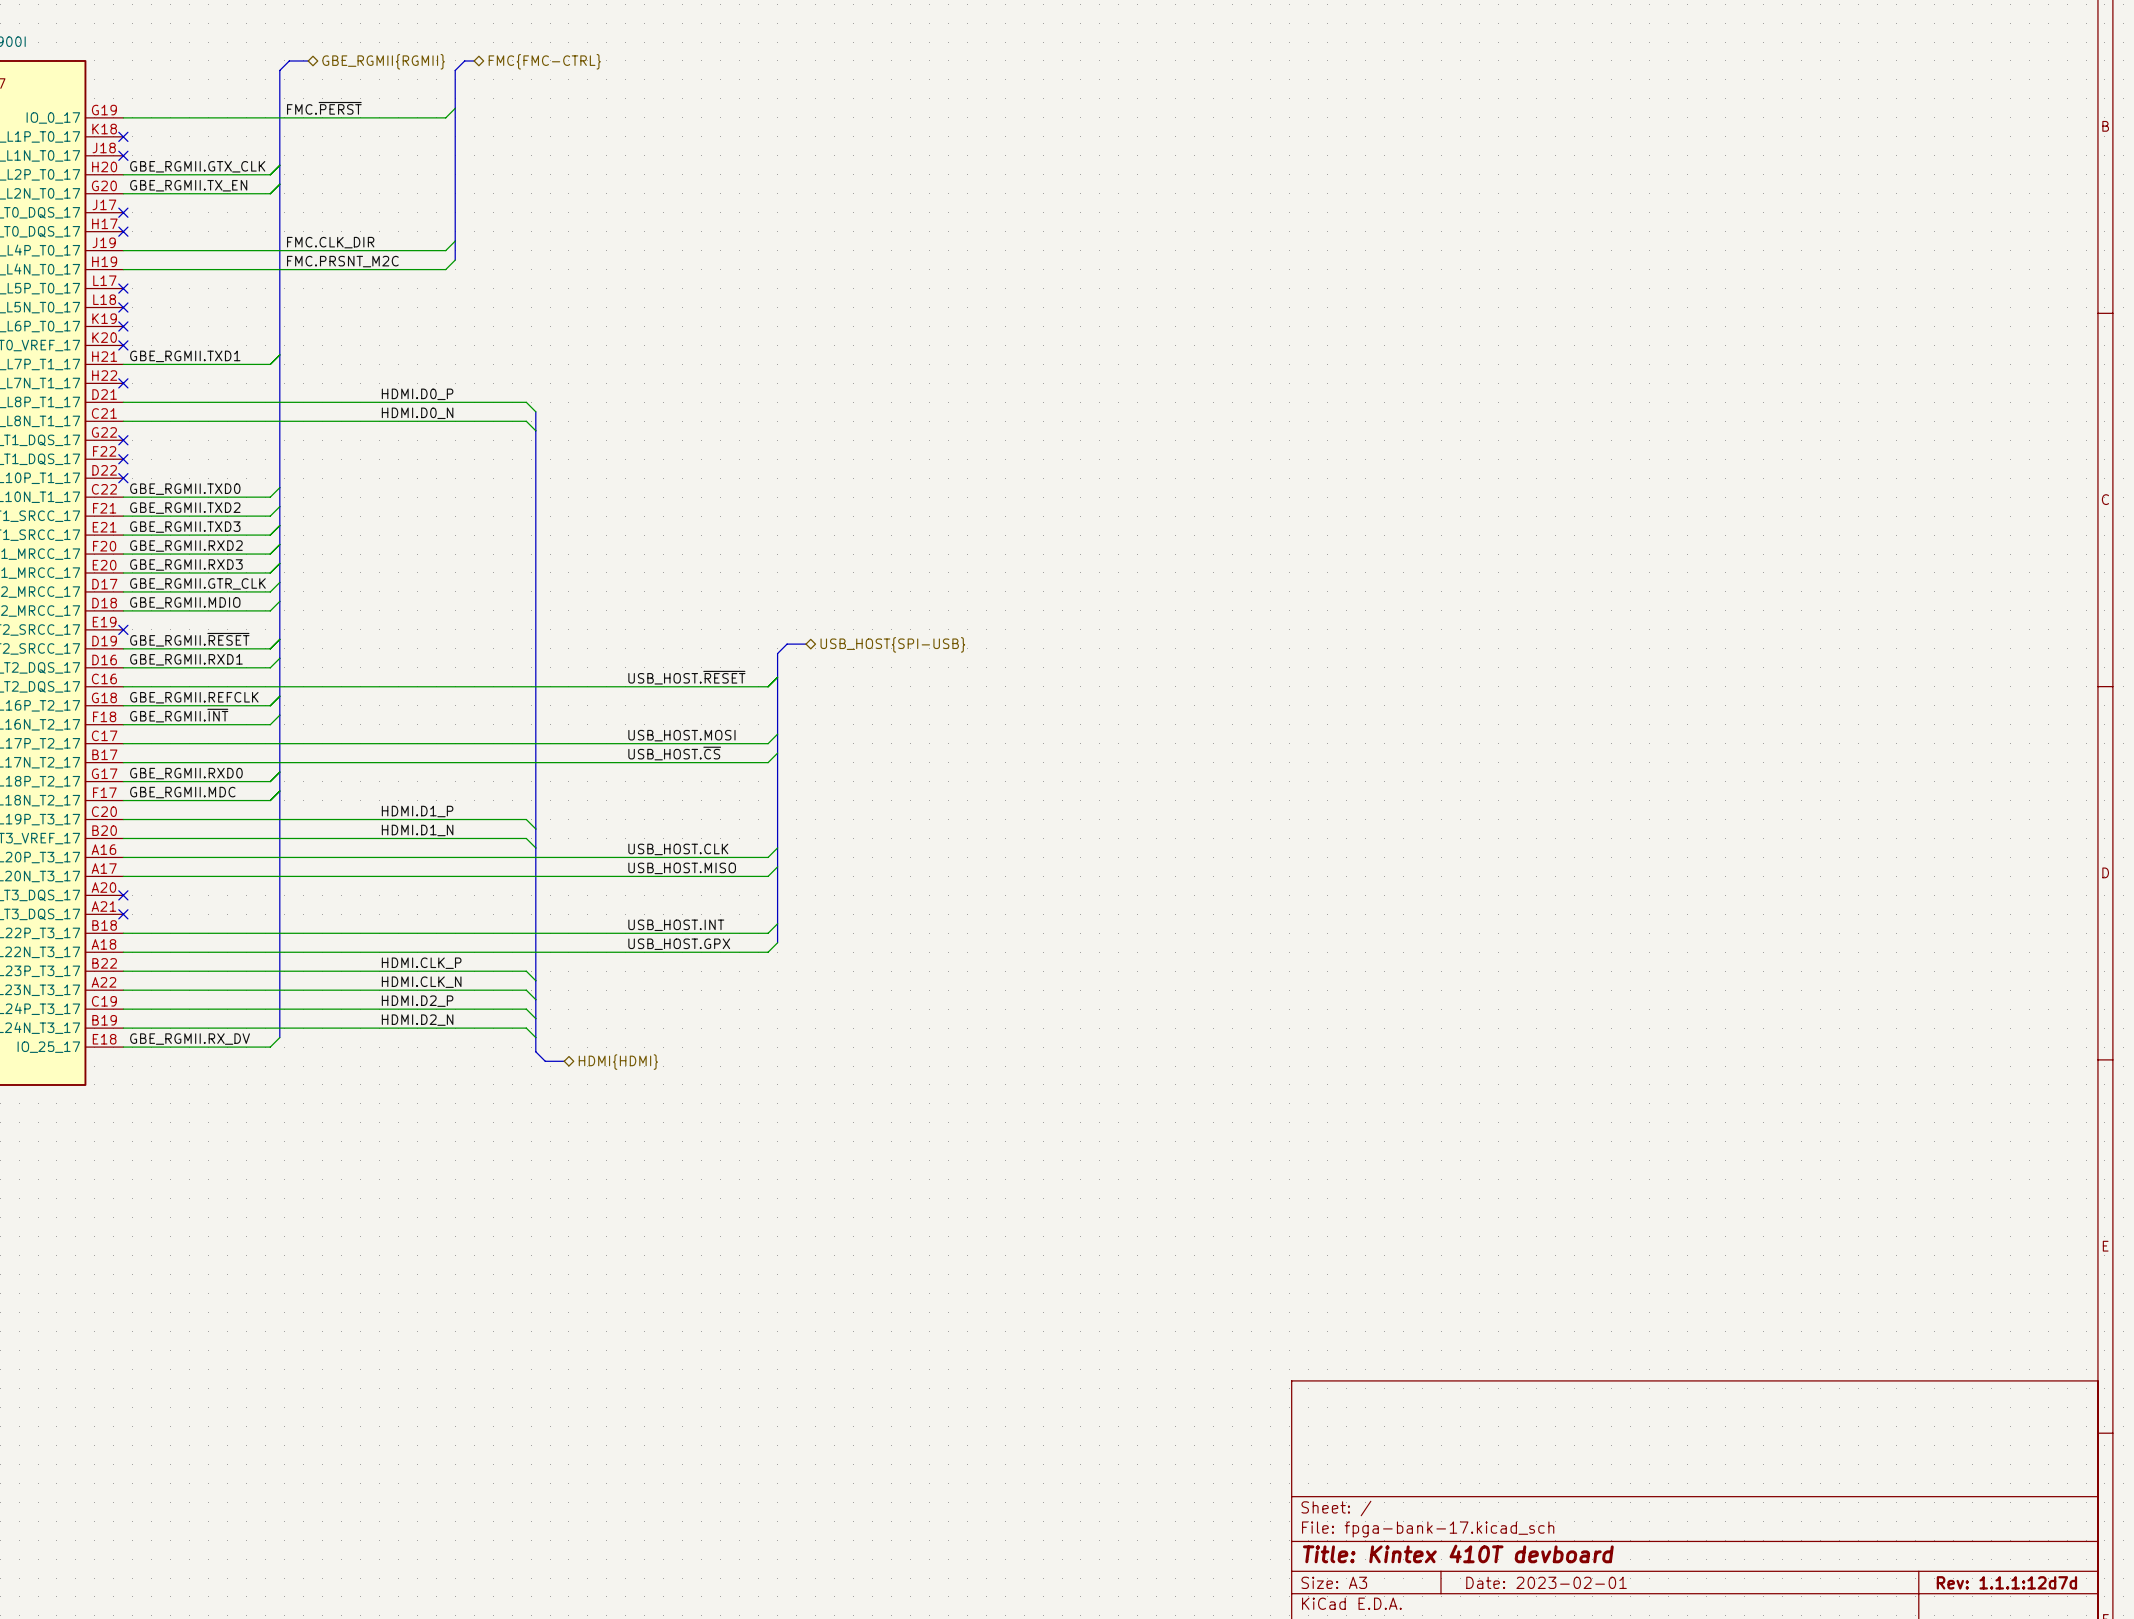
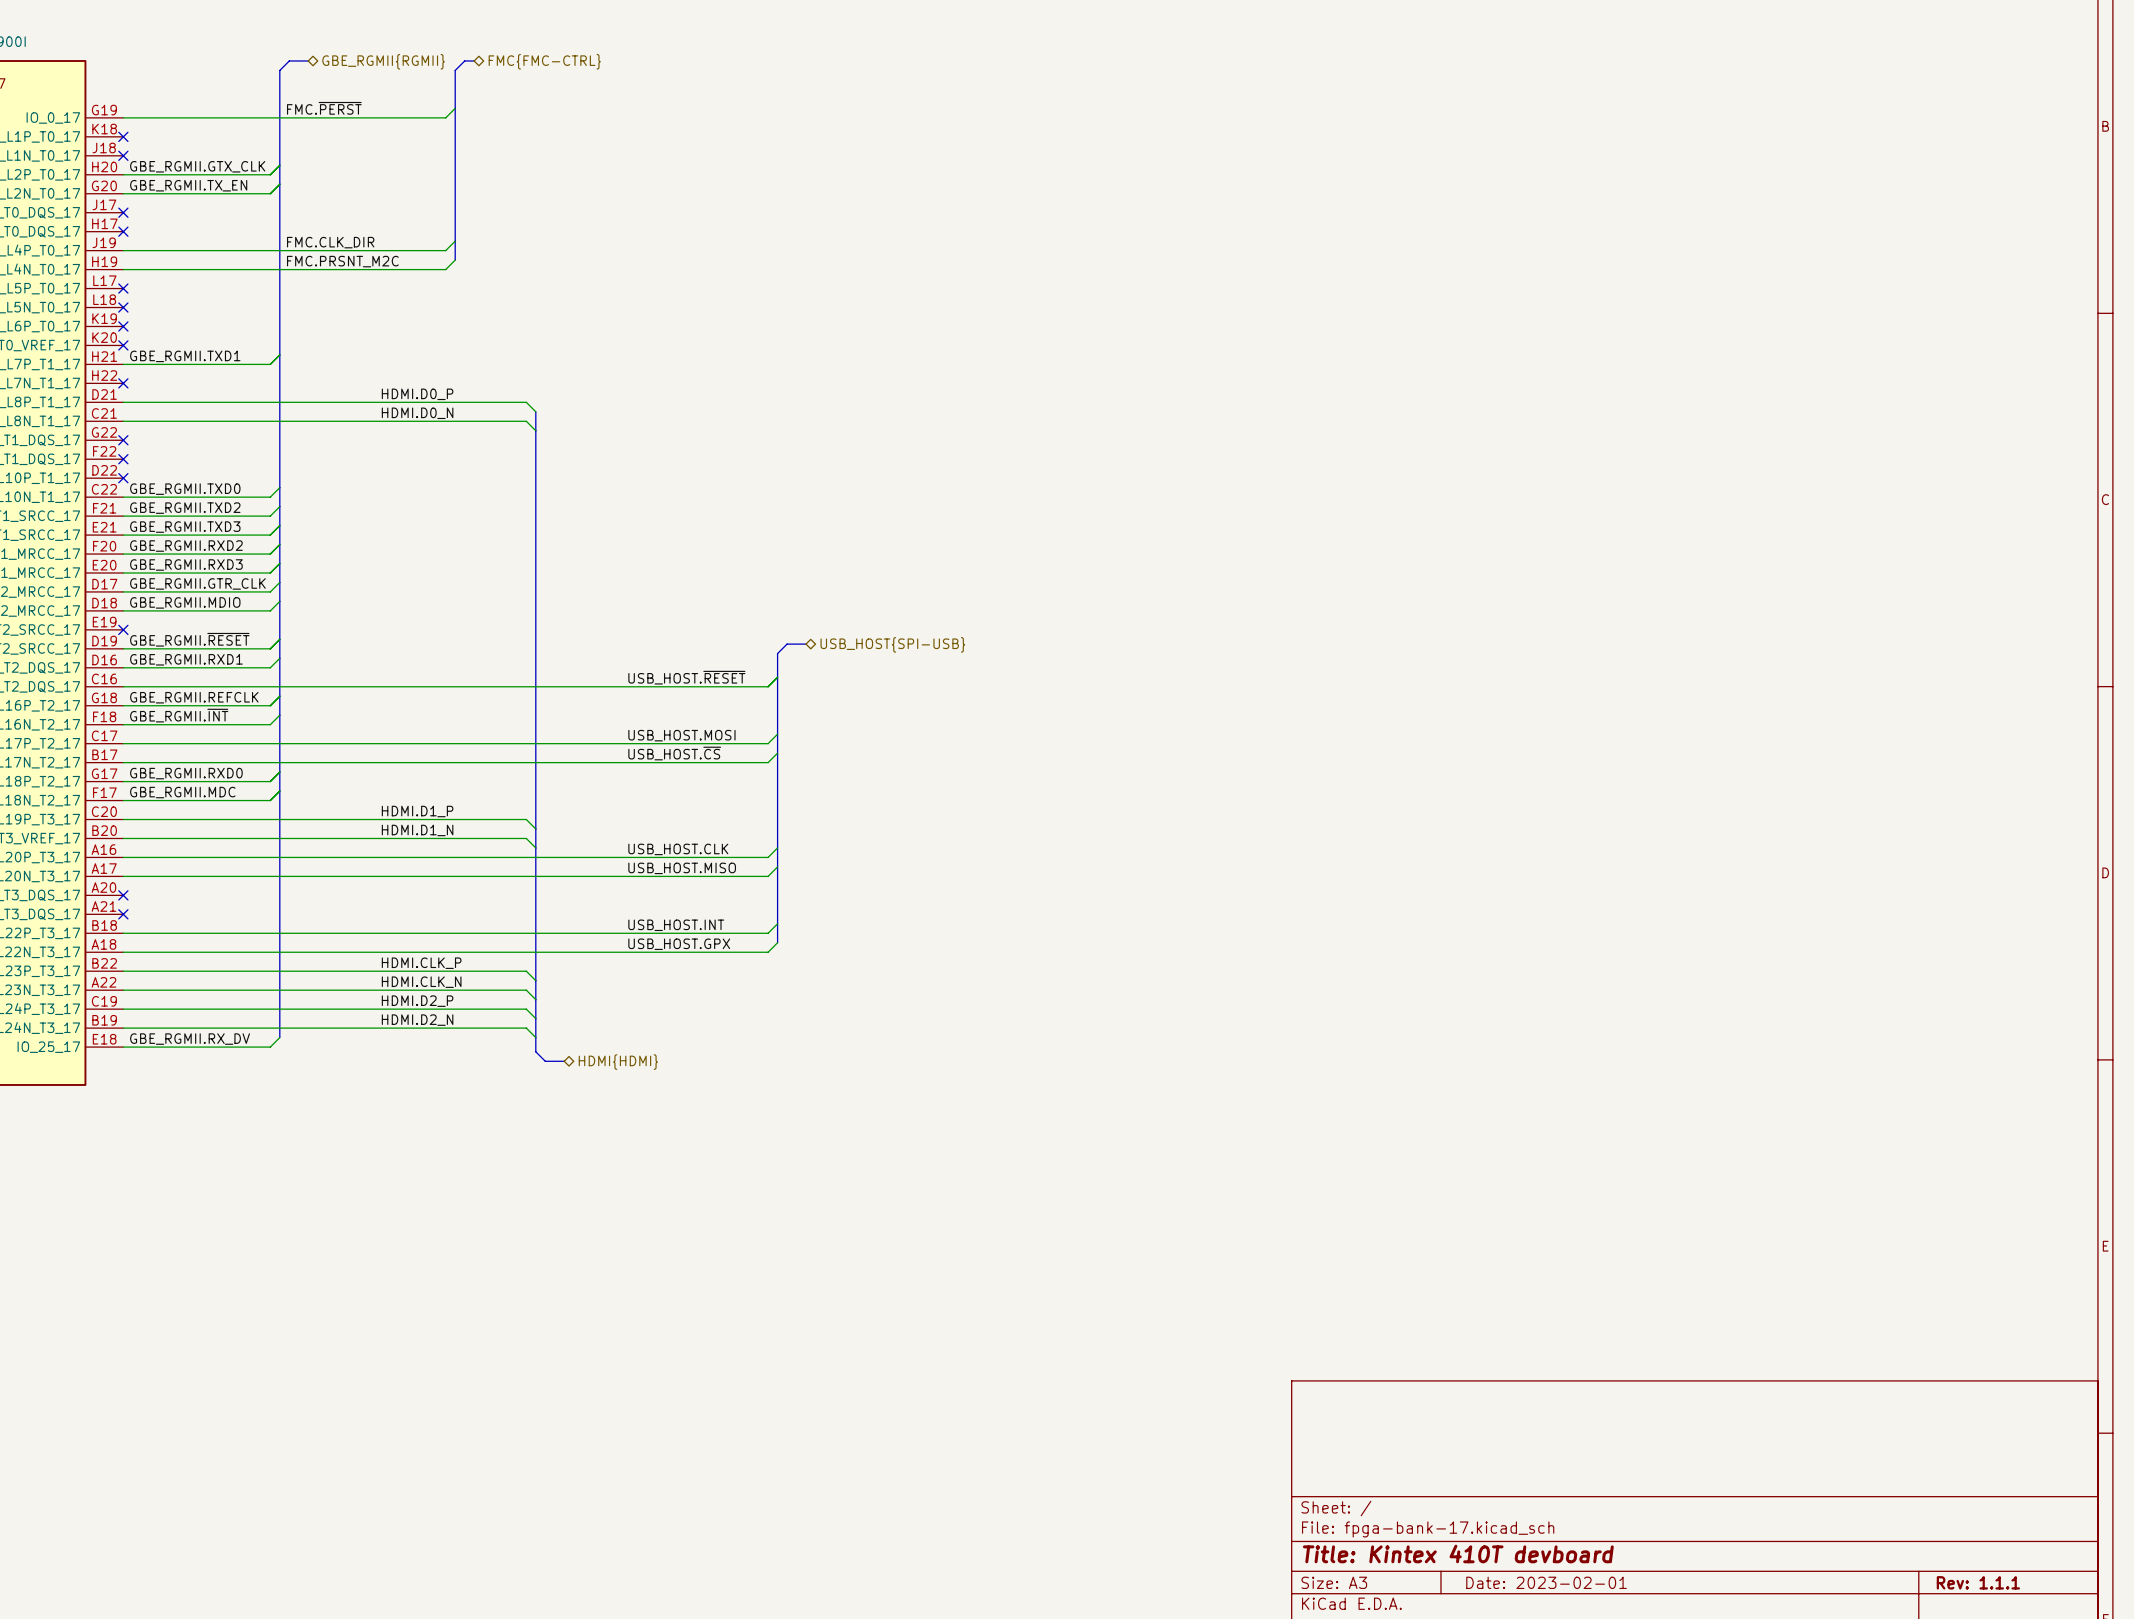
title block: Rev: 1.1.1:12d7d (2006, 1582) -> Rev: 1.1.1 (1978, 1582)

